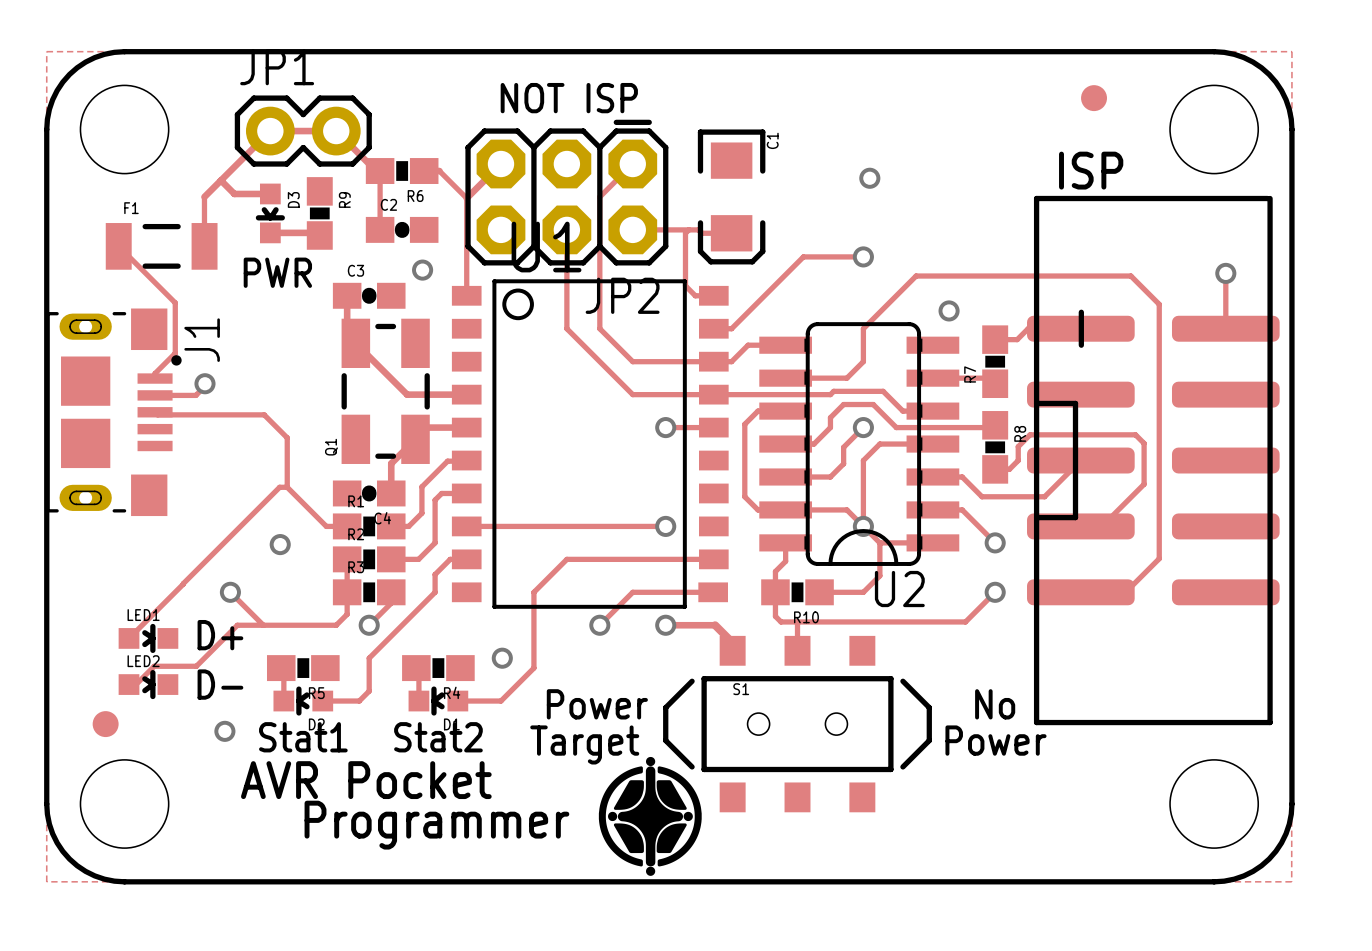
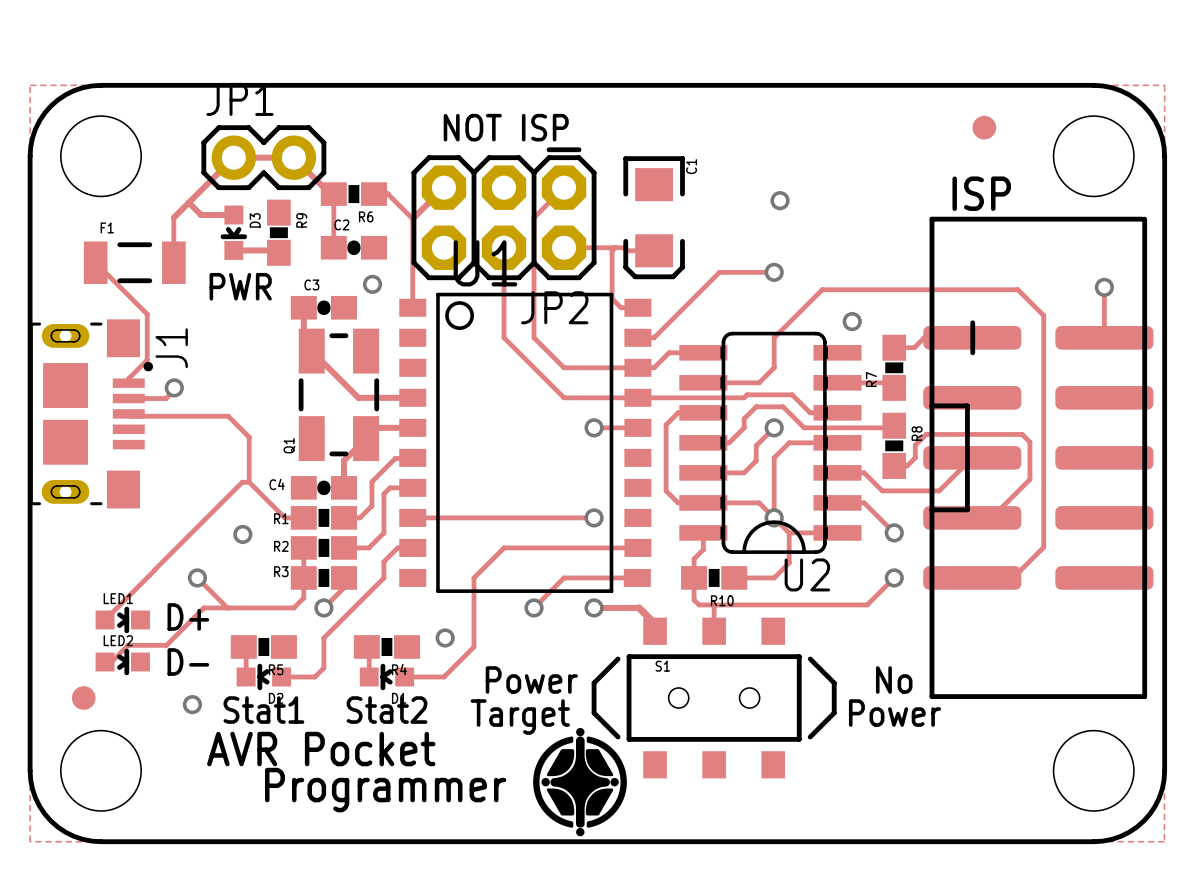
R1 name position: R1 (356, 501) -> R1 (281, 518)
C4 name position: C4 (382, 518) -> C4 (277, 484)
R2 name position: R2 (356, 534) -> R2 (281, 546)
R3 name position: R3 (356, 567) -> R3 (281, 571)

